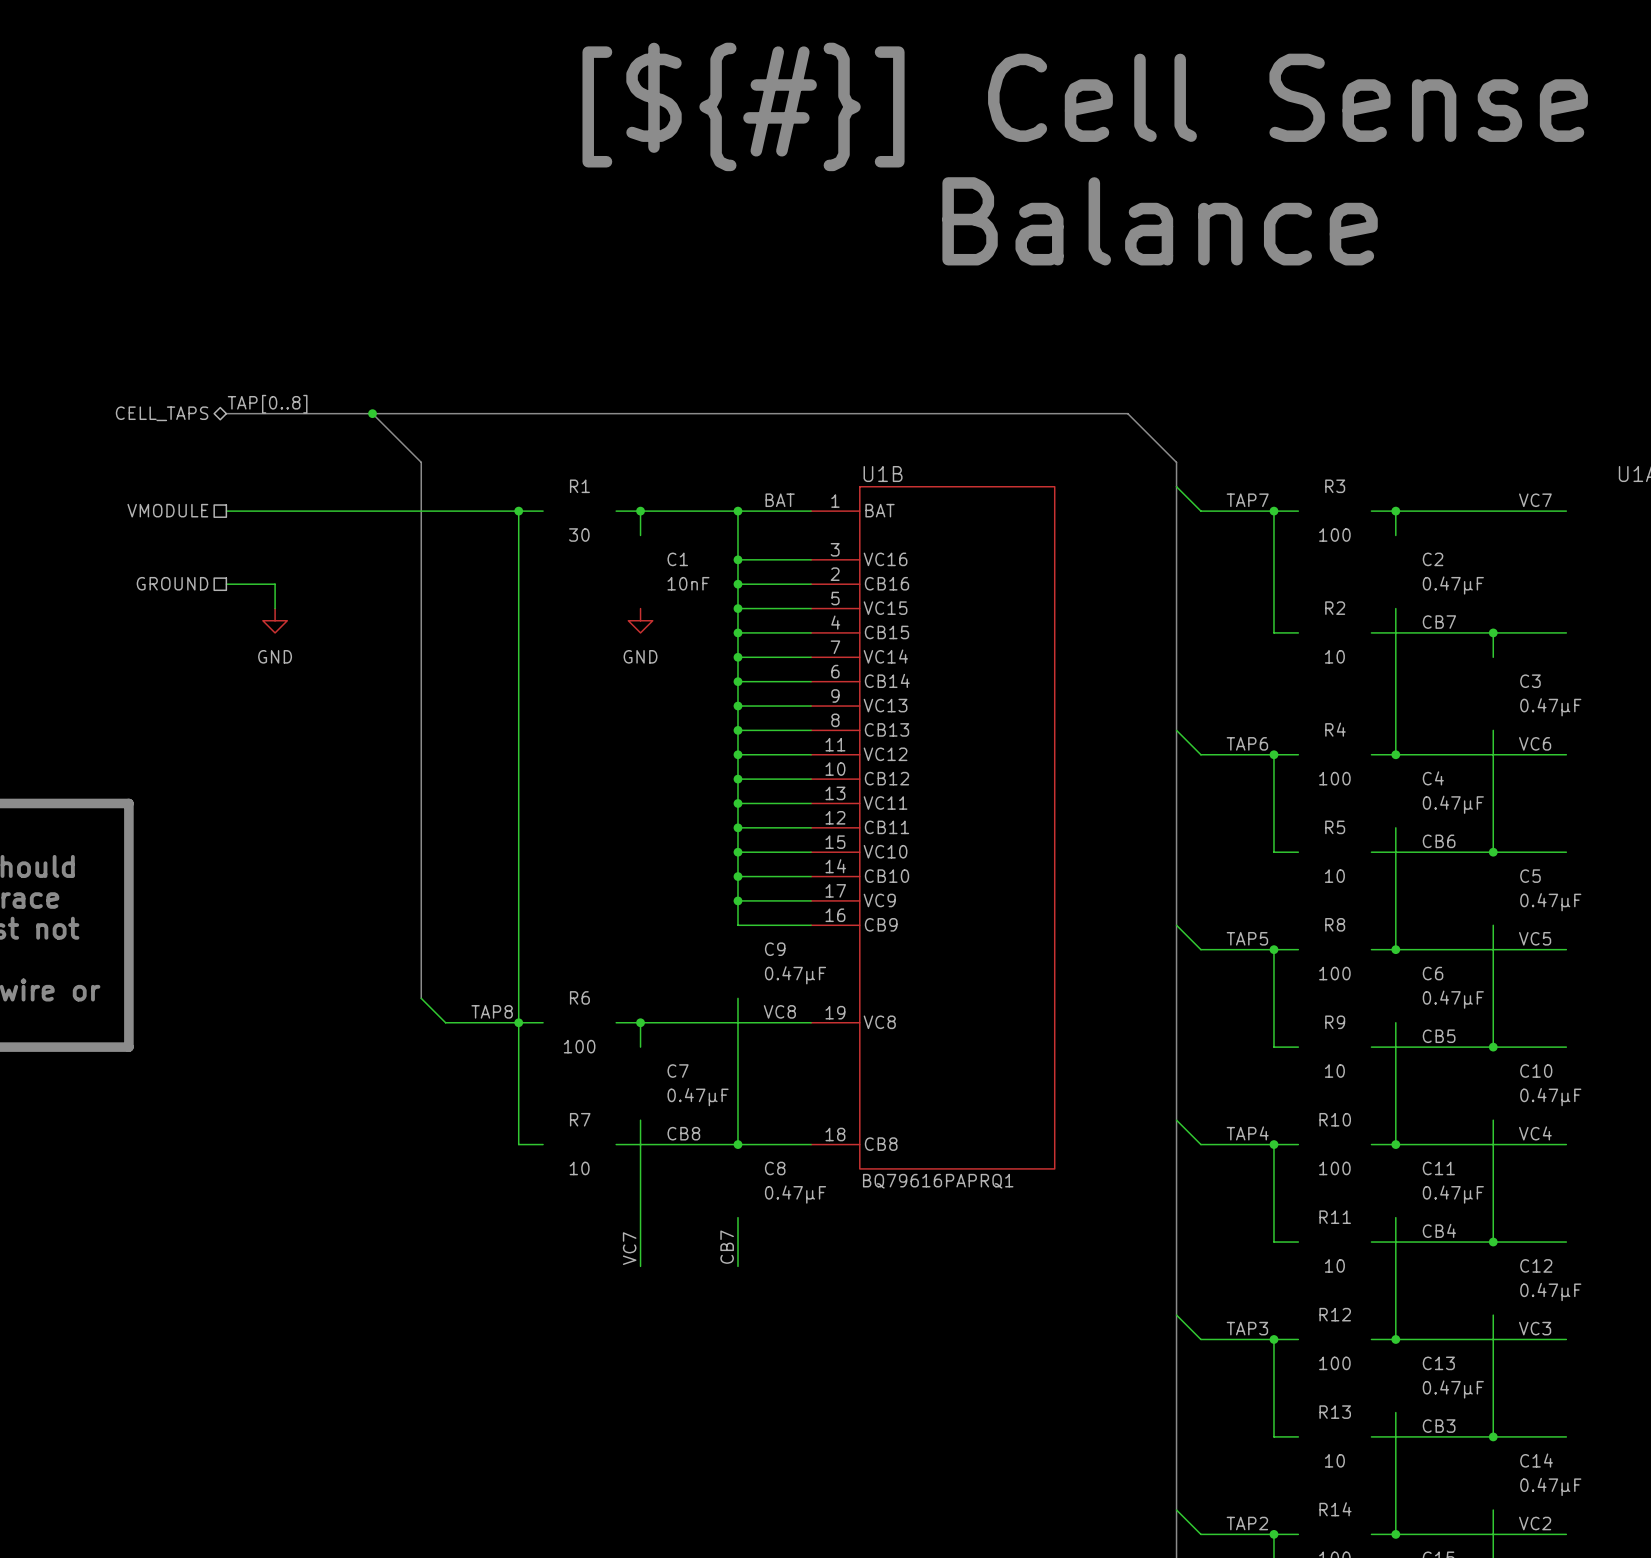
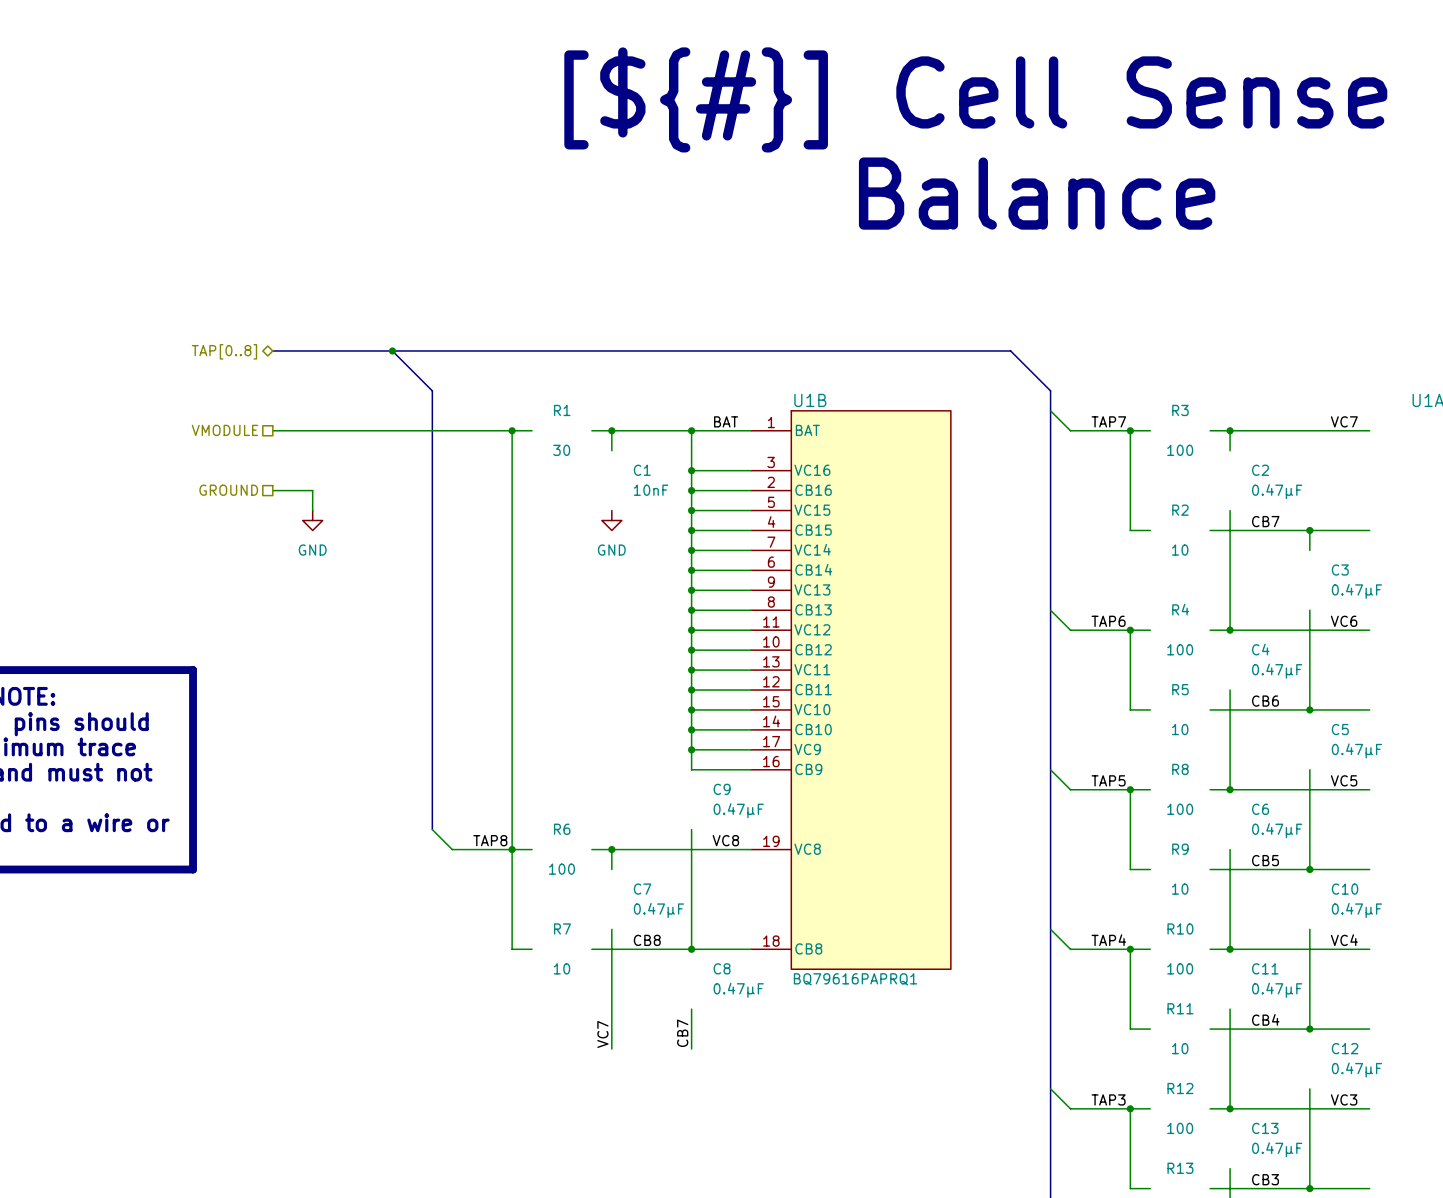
label: TAP[0..8] (267, 404) -> none
hierarchical label: CELL_TAPS (162, 413) -> TAP[0..8] (224, 351)

